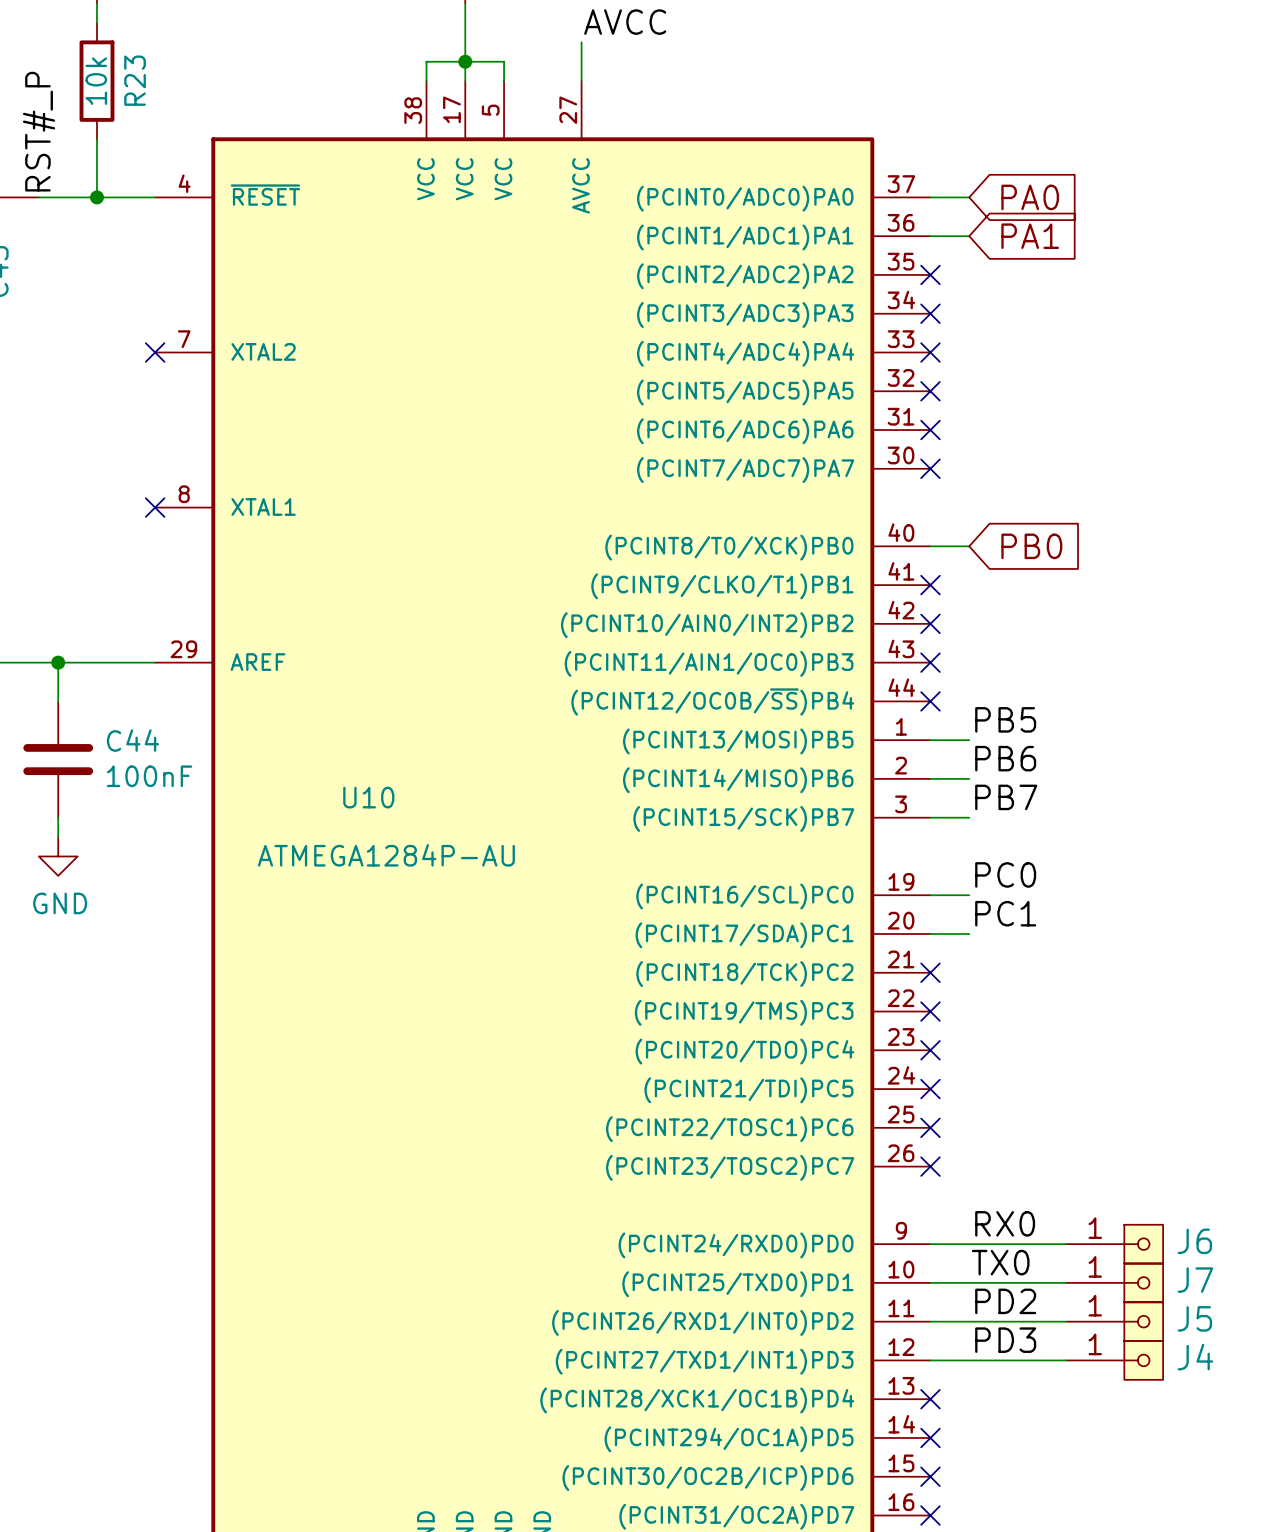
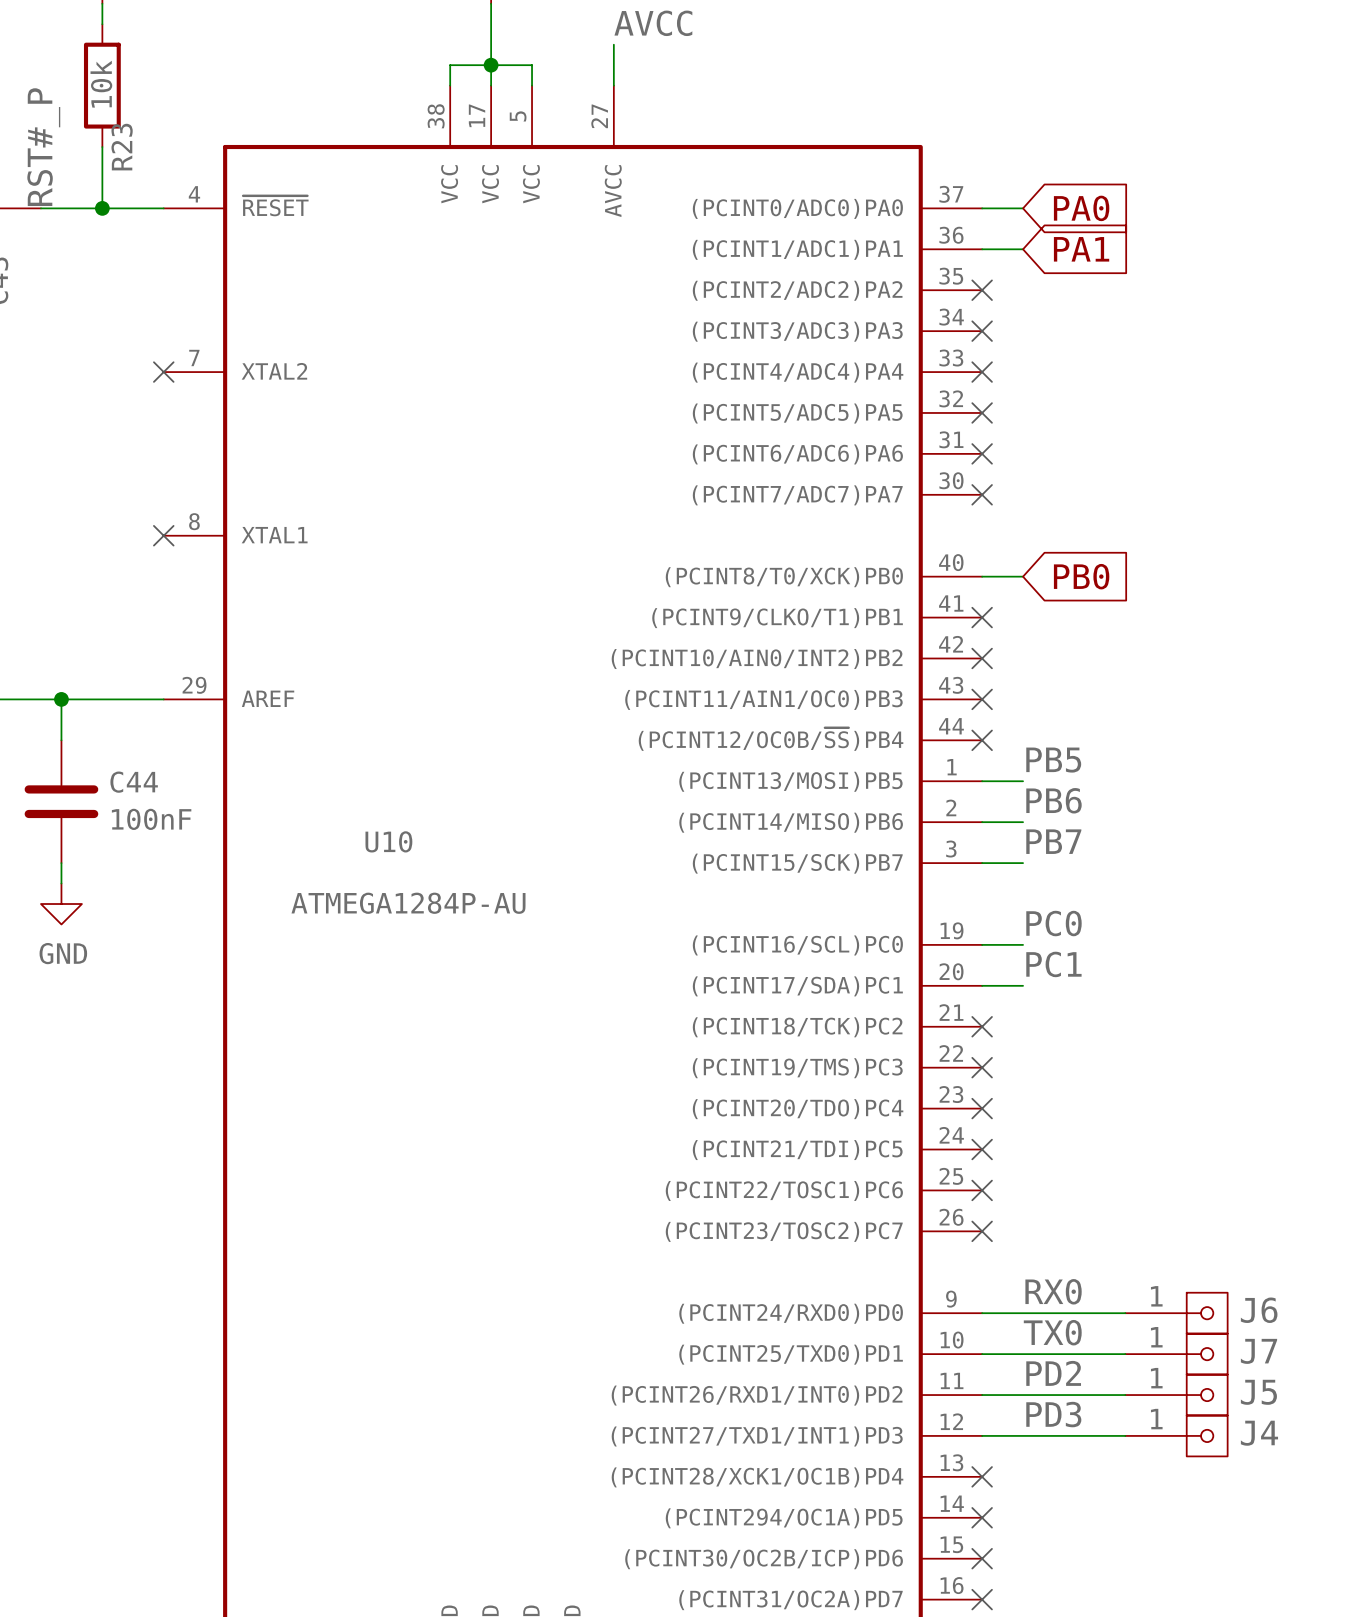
R23 name position: R23 (135, 80) -> R23 (122, 147)

